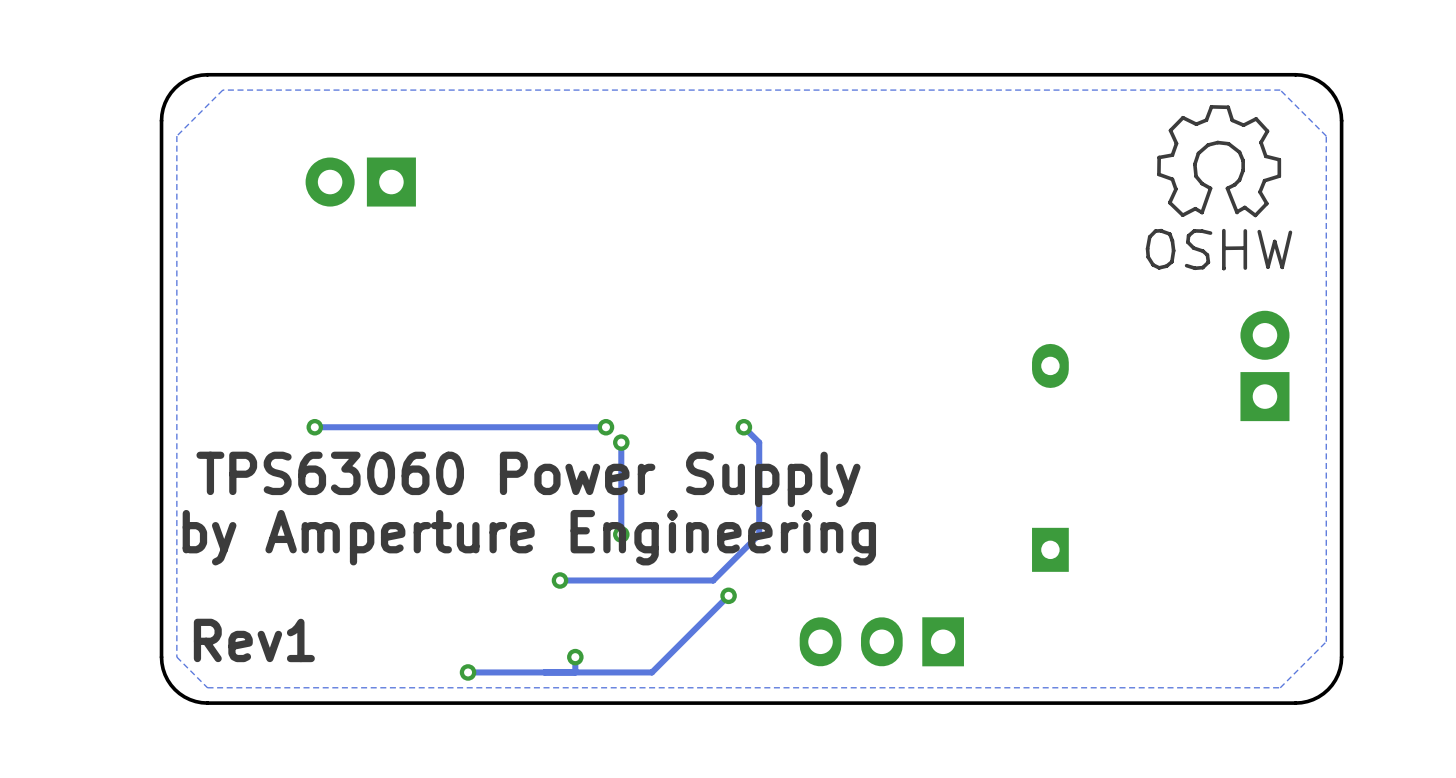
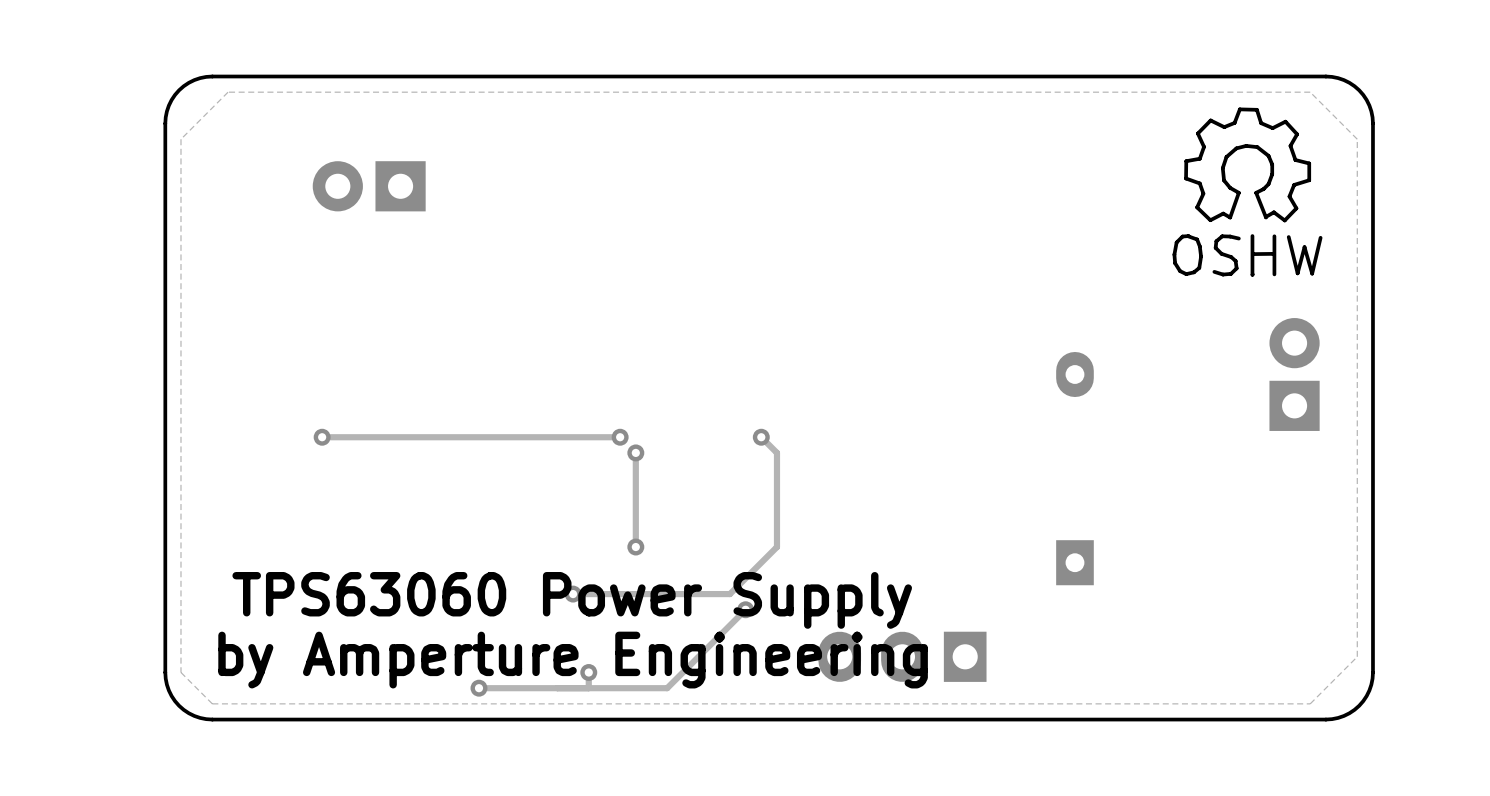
text position: TPS63060 Power Supply (528, 479) -> TPS63060 Power Supply (572, 600)
text position: by Amperture Engineering (529, 537) -> by Amperture Engineering (573, 660)
text: Rev1 (254, 640) -> none

